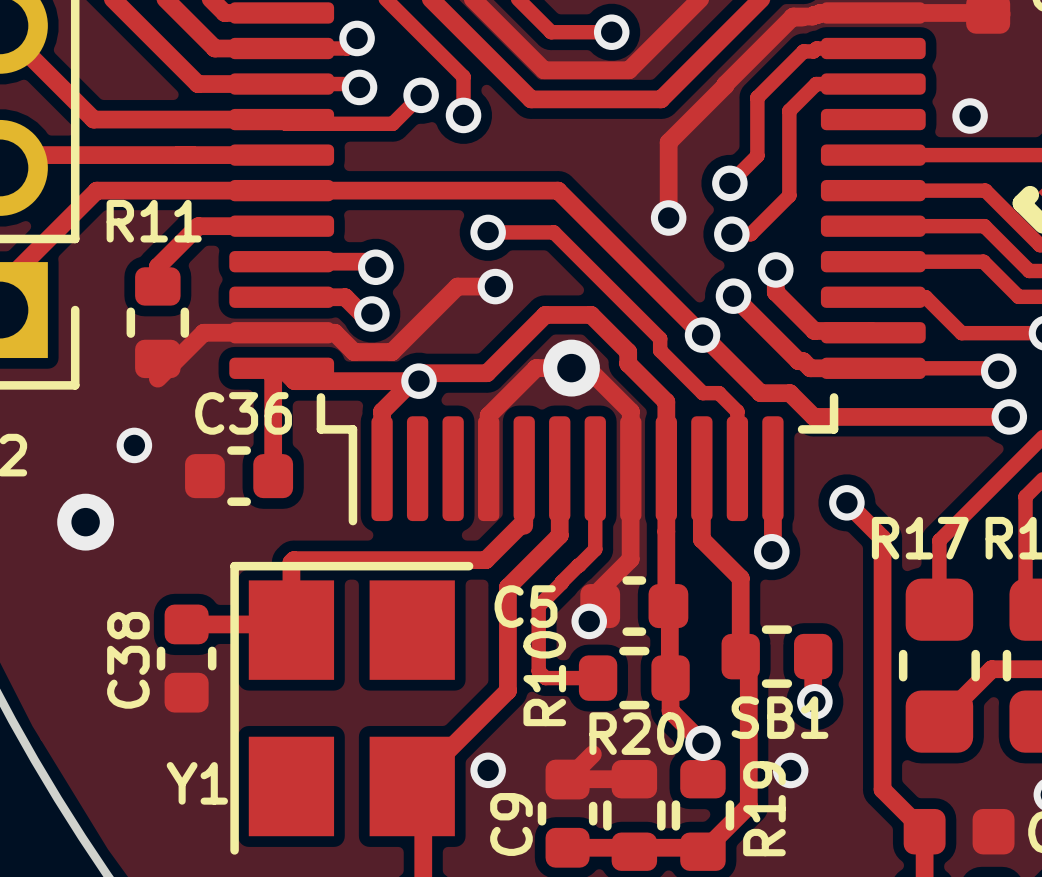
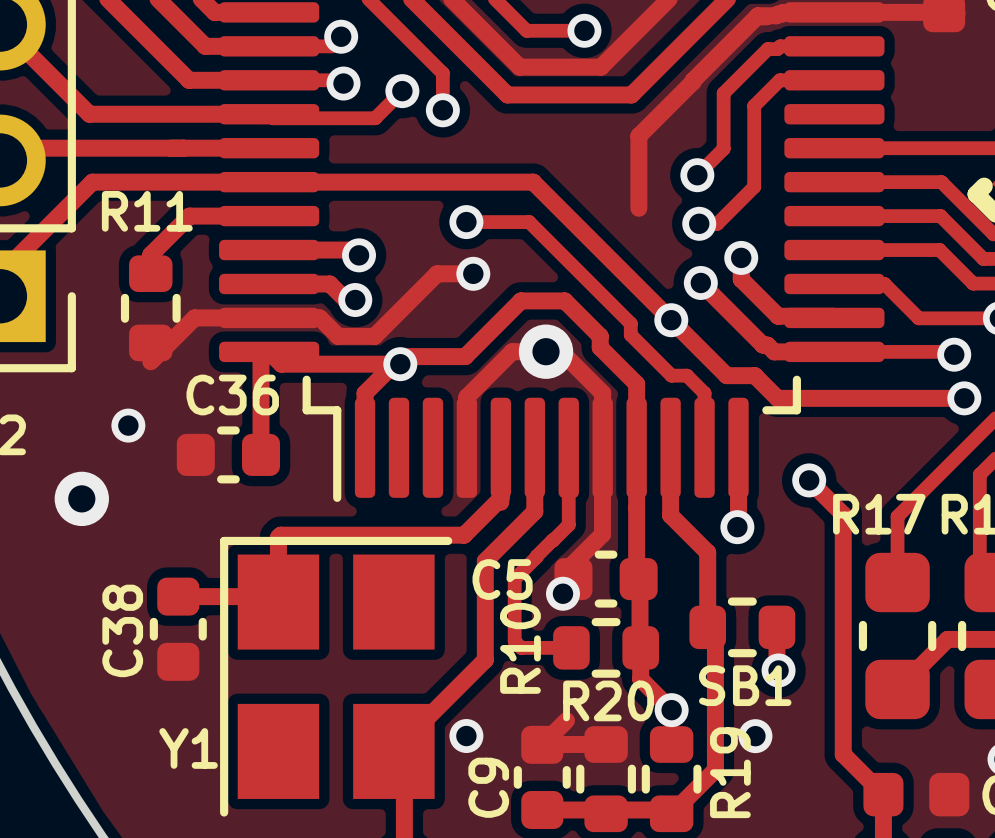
via: (970, 116) -> none
via: (668, 217) -> none

